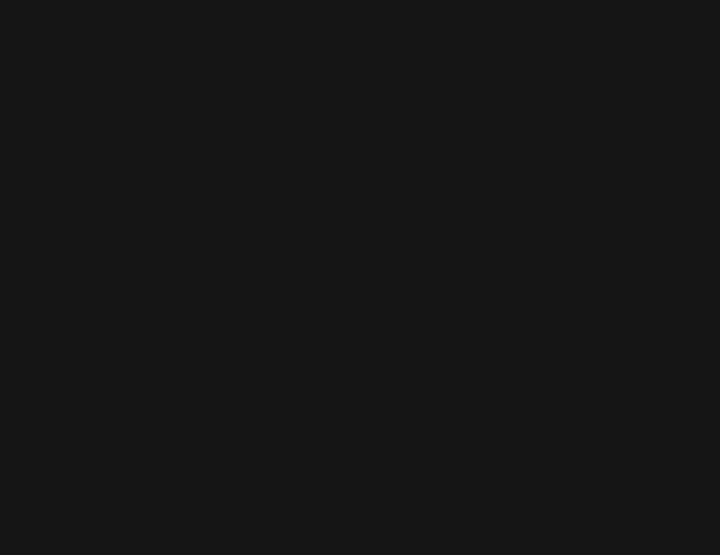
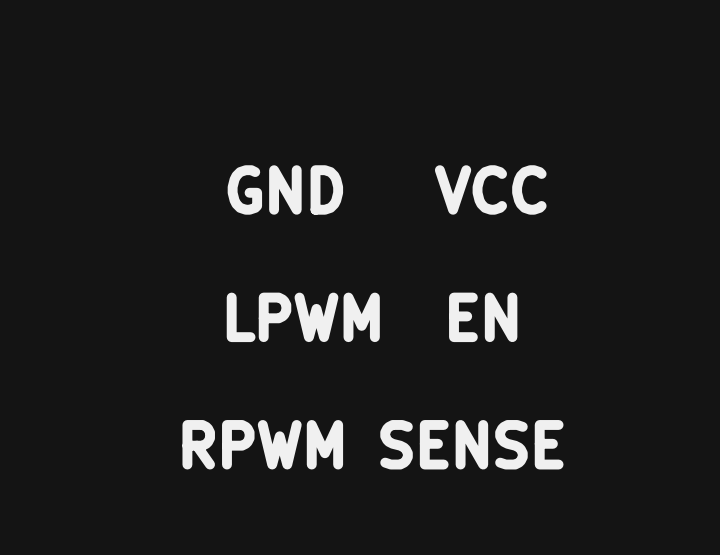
text: none -> GND VCC (387, 189)
text: none -> LPWM EN (372, 317)
text: none -> RPWM SENSE (372, 444)

